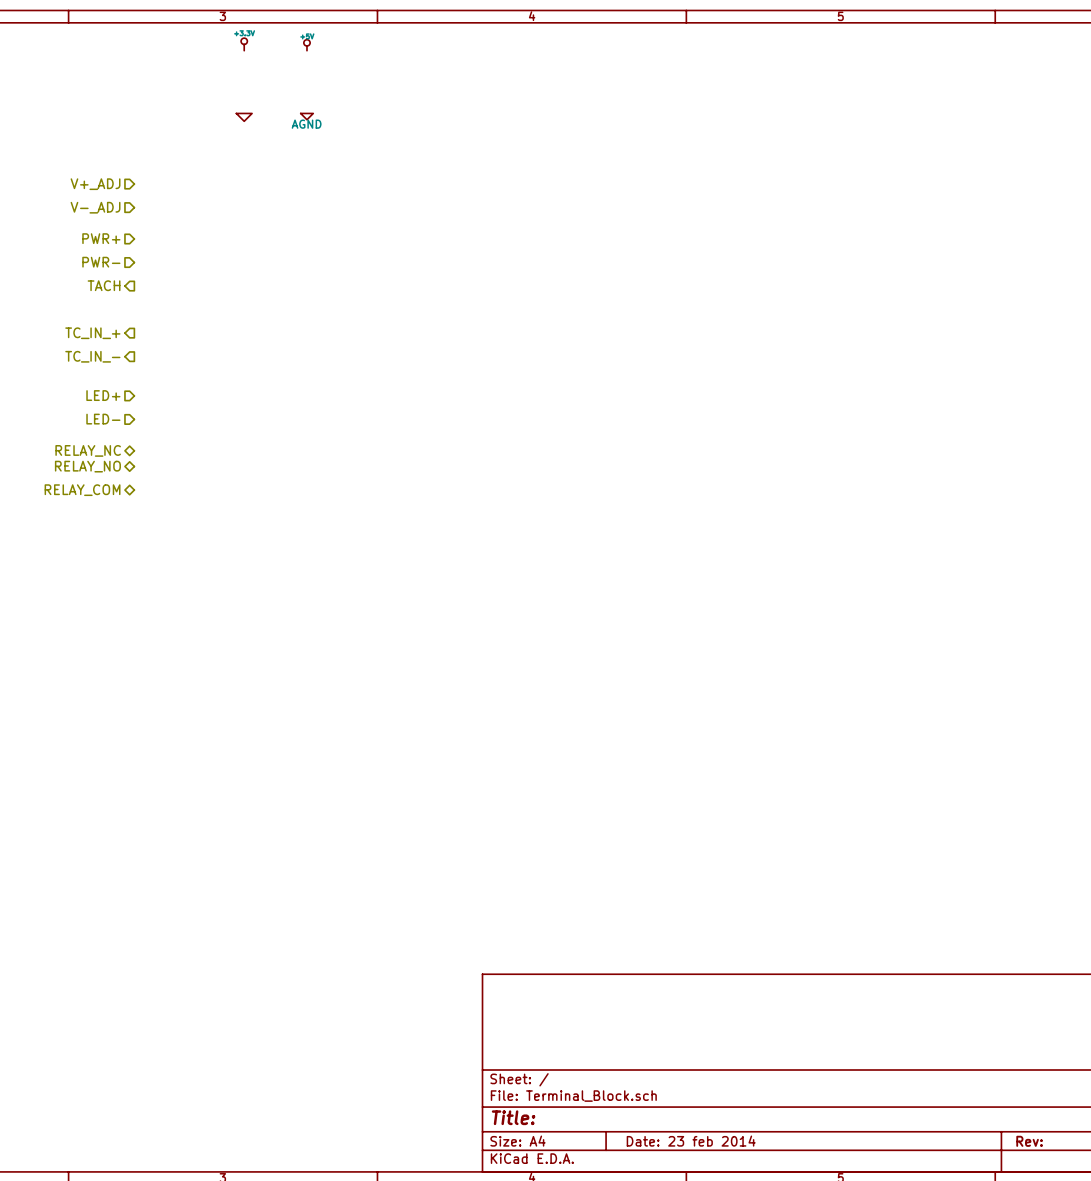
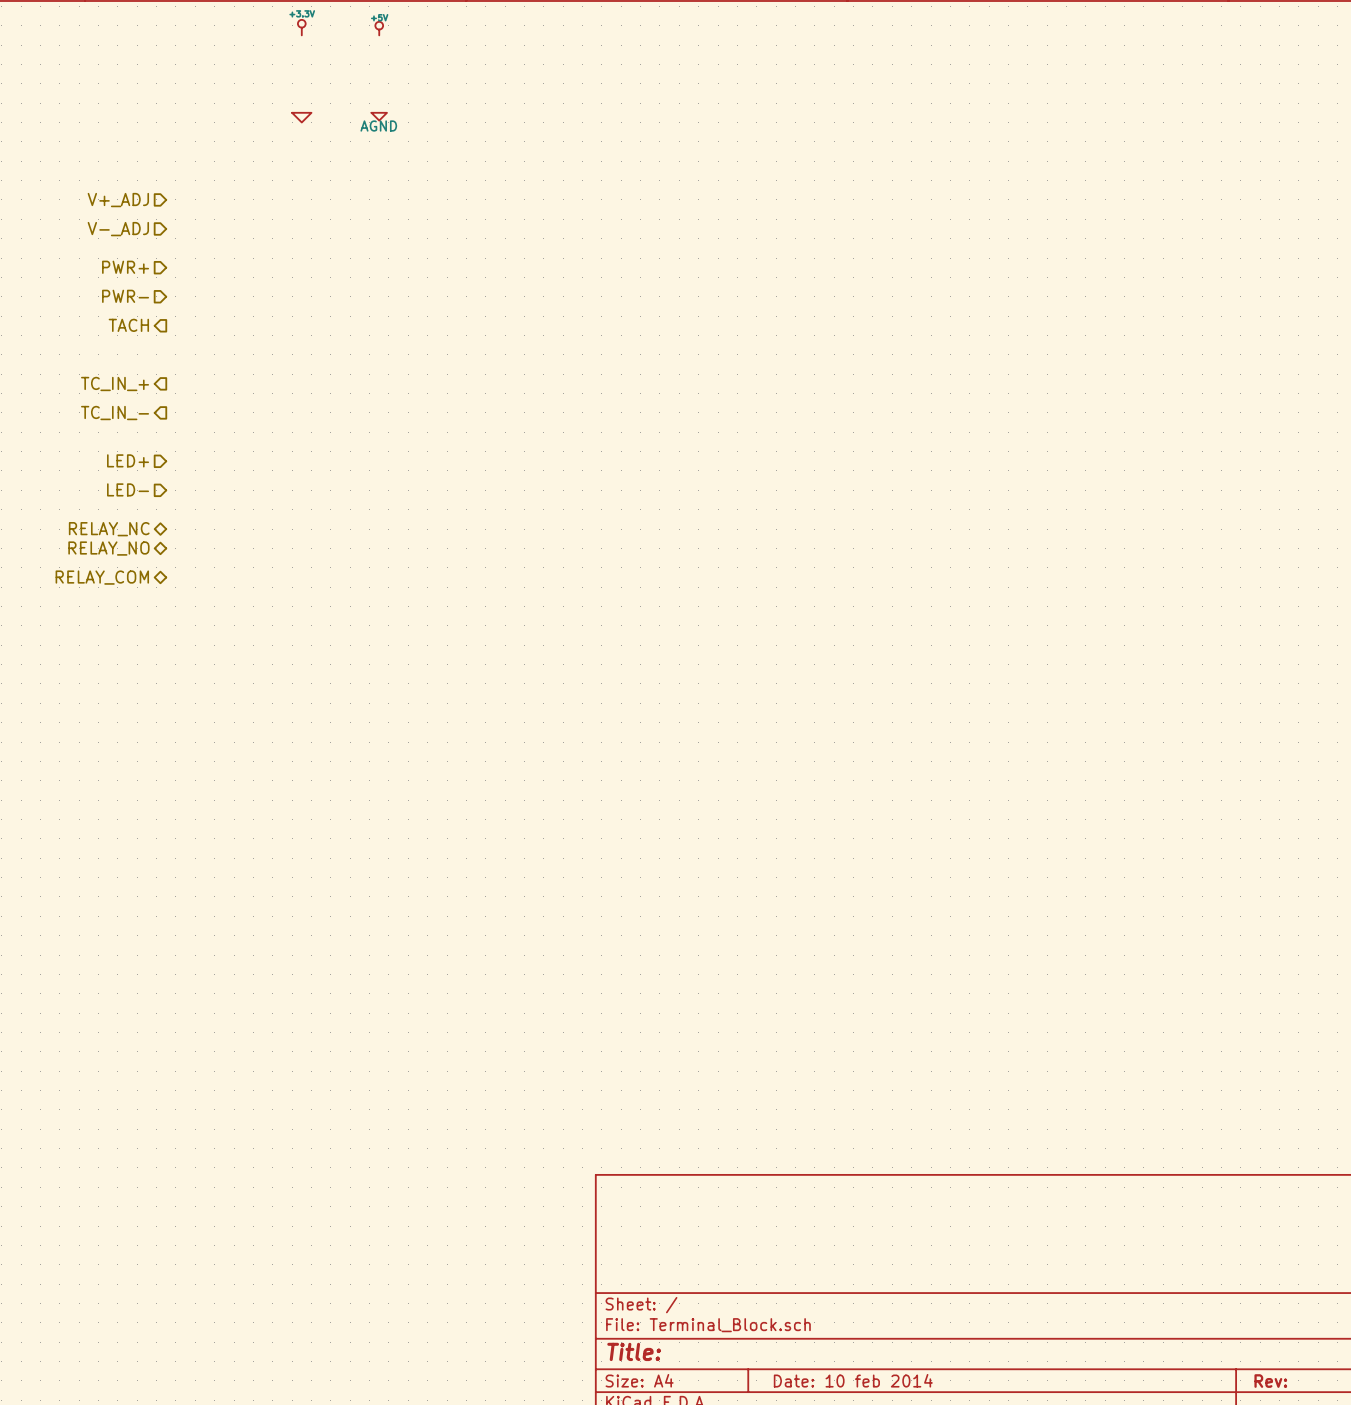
title block: Date: 23 feb 2014 (691, 1141) -> Date: 10 feb 2014 (853, 1380)

